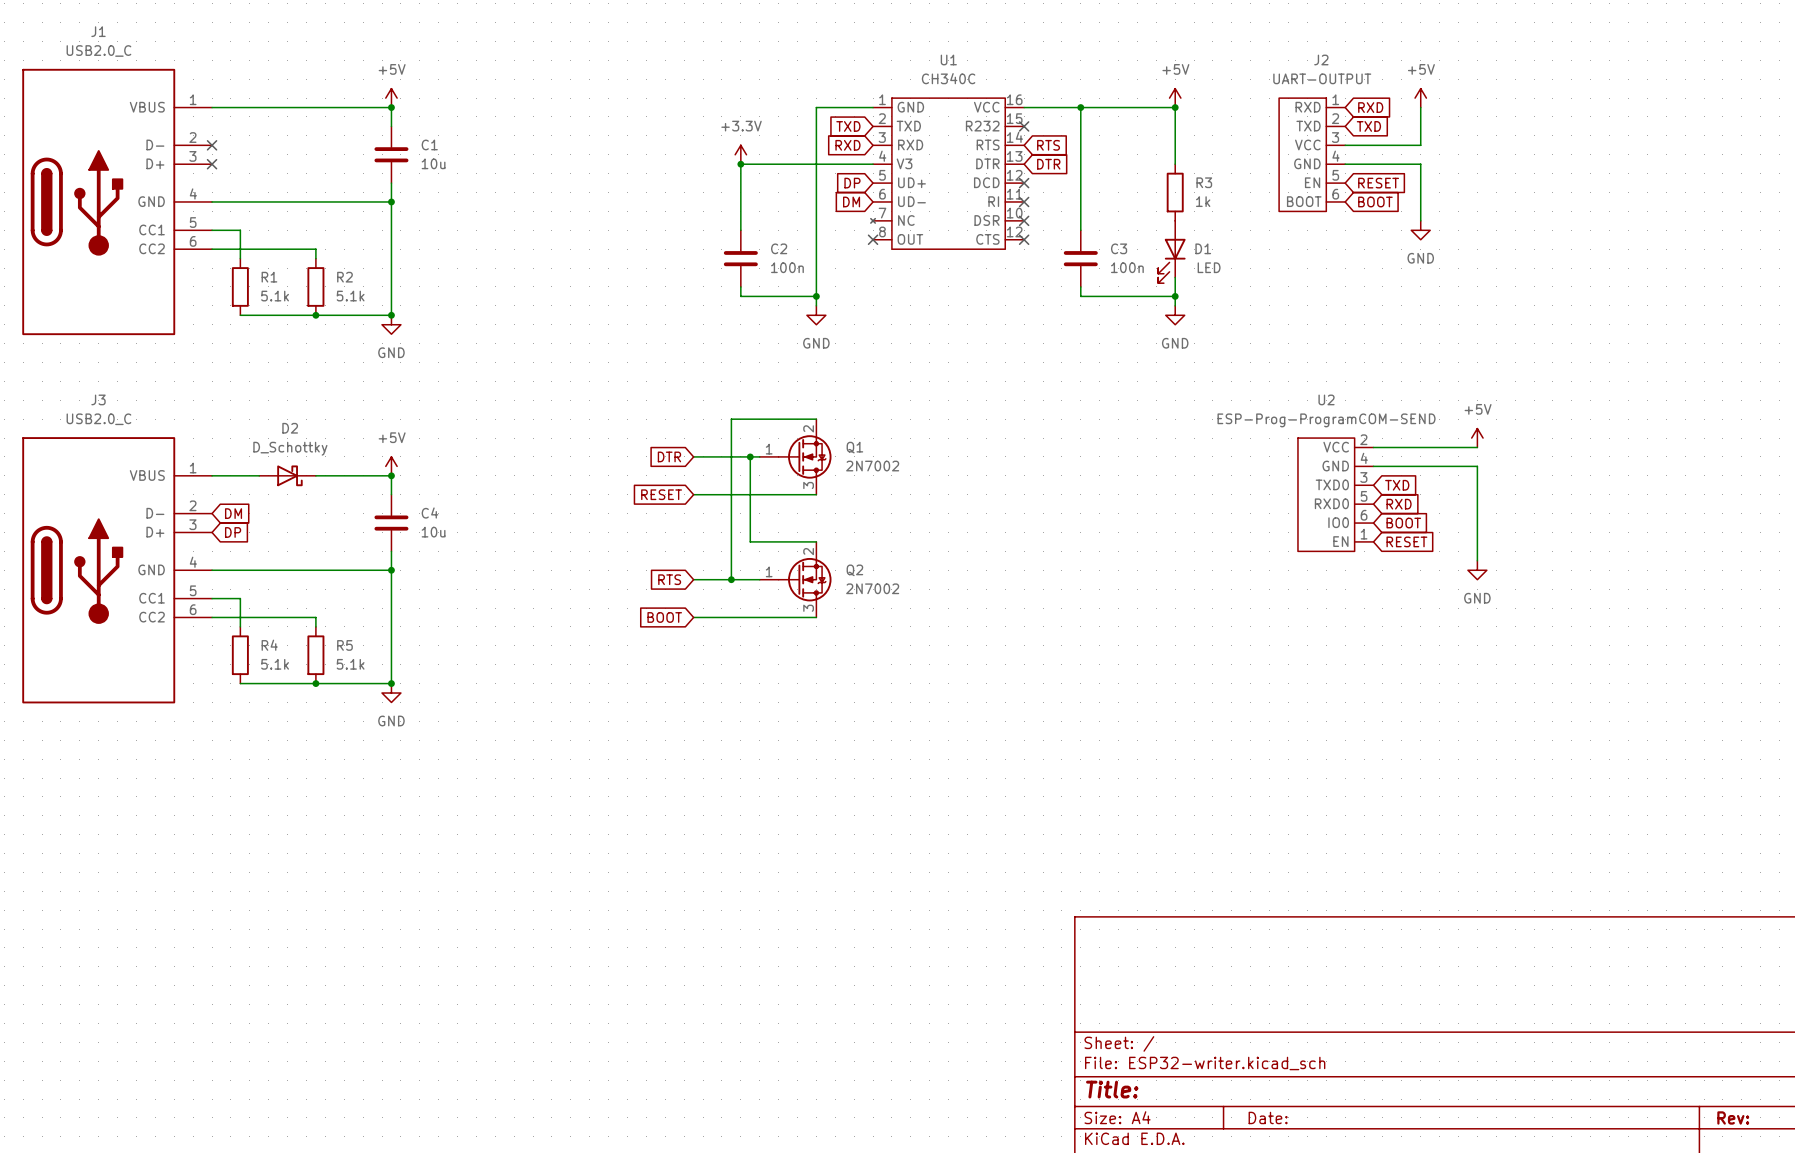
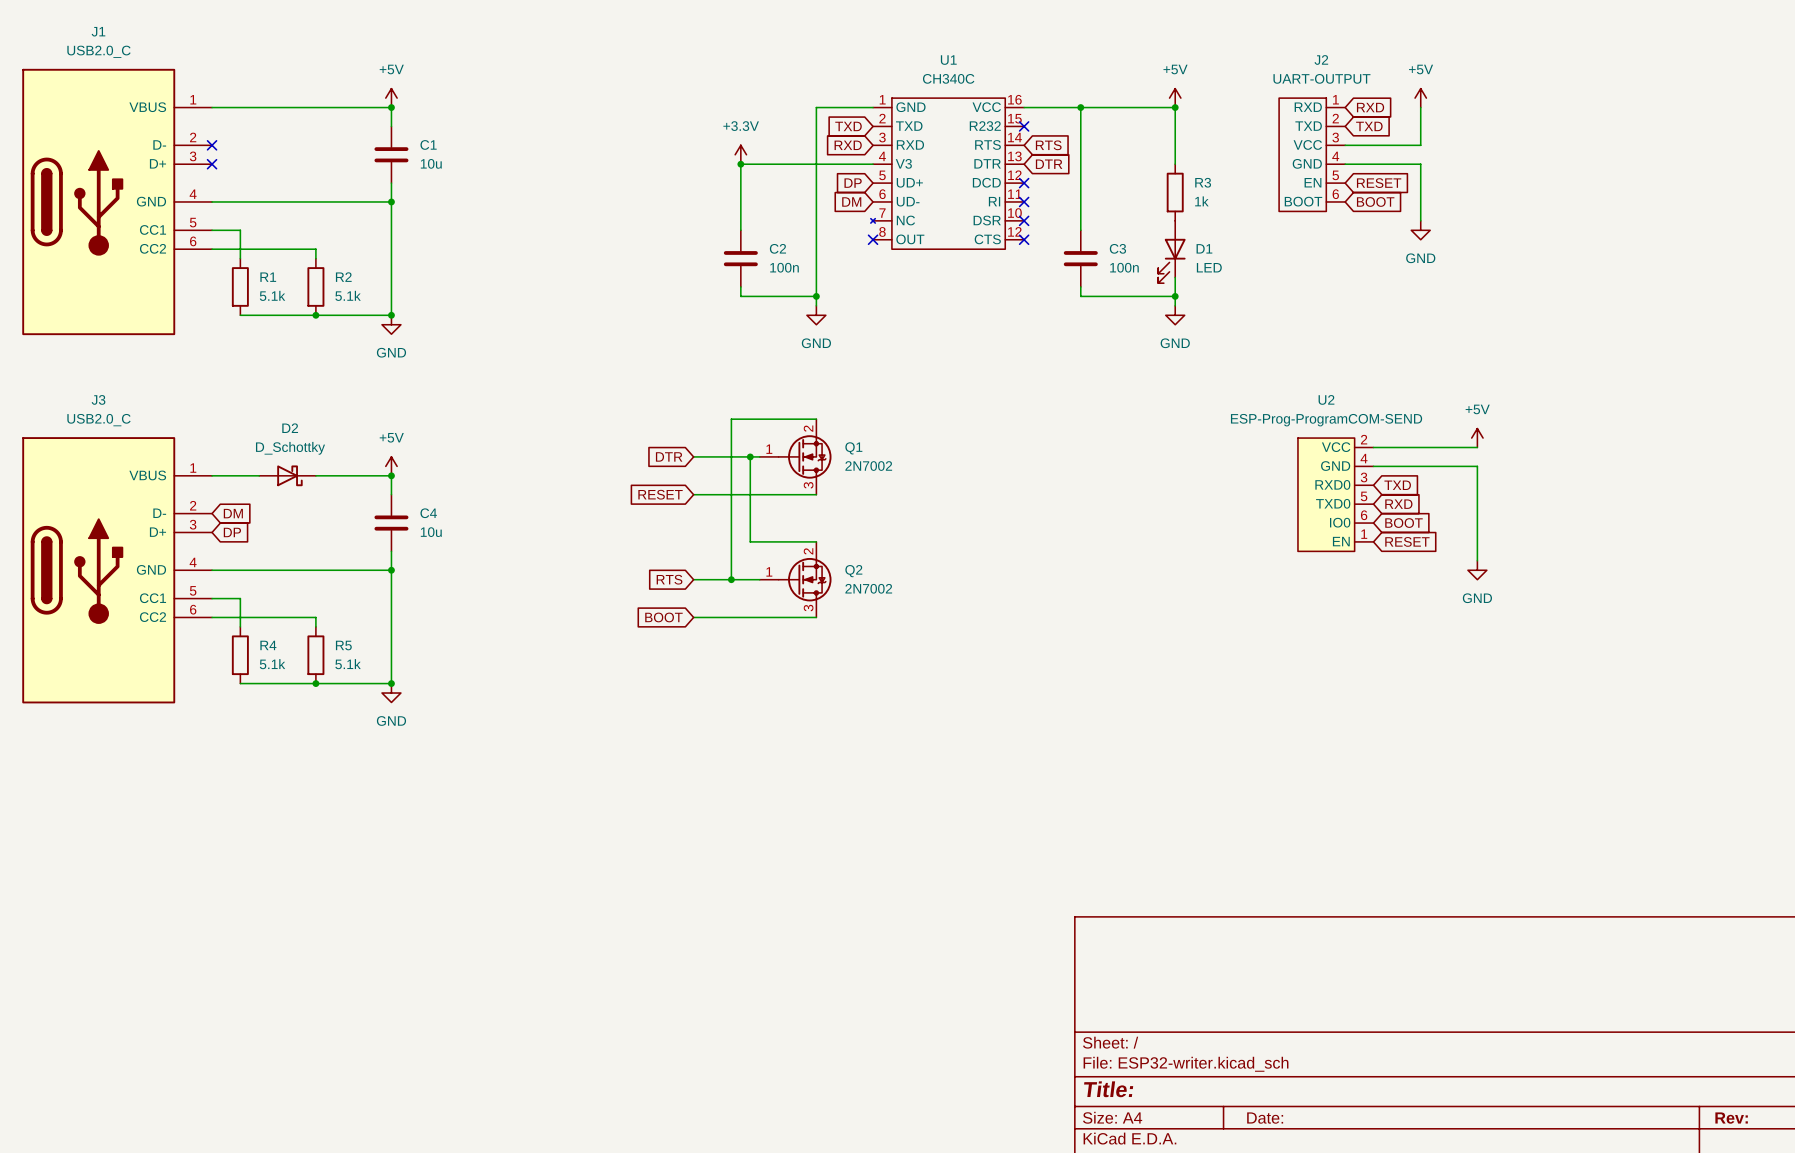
U2 pin name: TXD0 (1332, 484) -> RXD0 (1332, 484)
U2 pin name: RXD0 (1331, 503) -> TXD0 (1333, 503)

